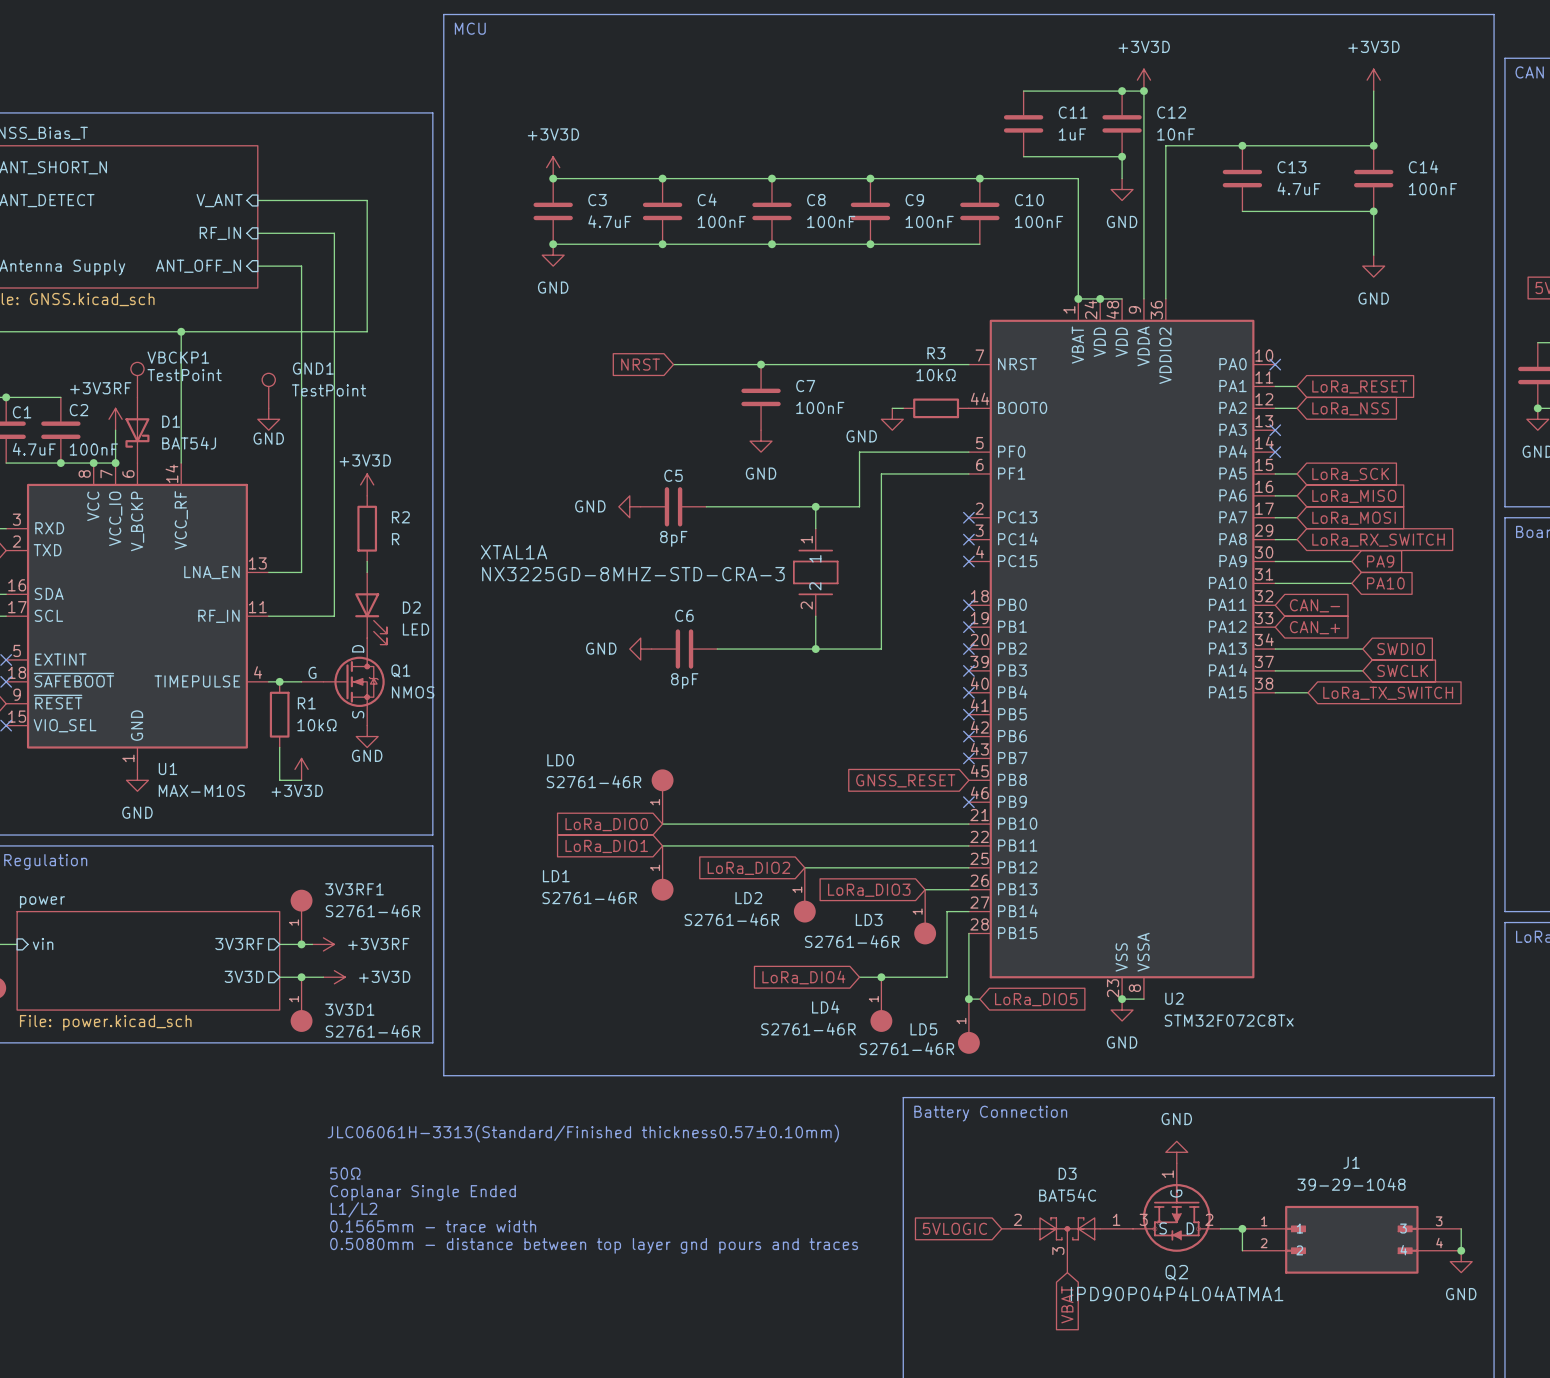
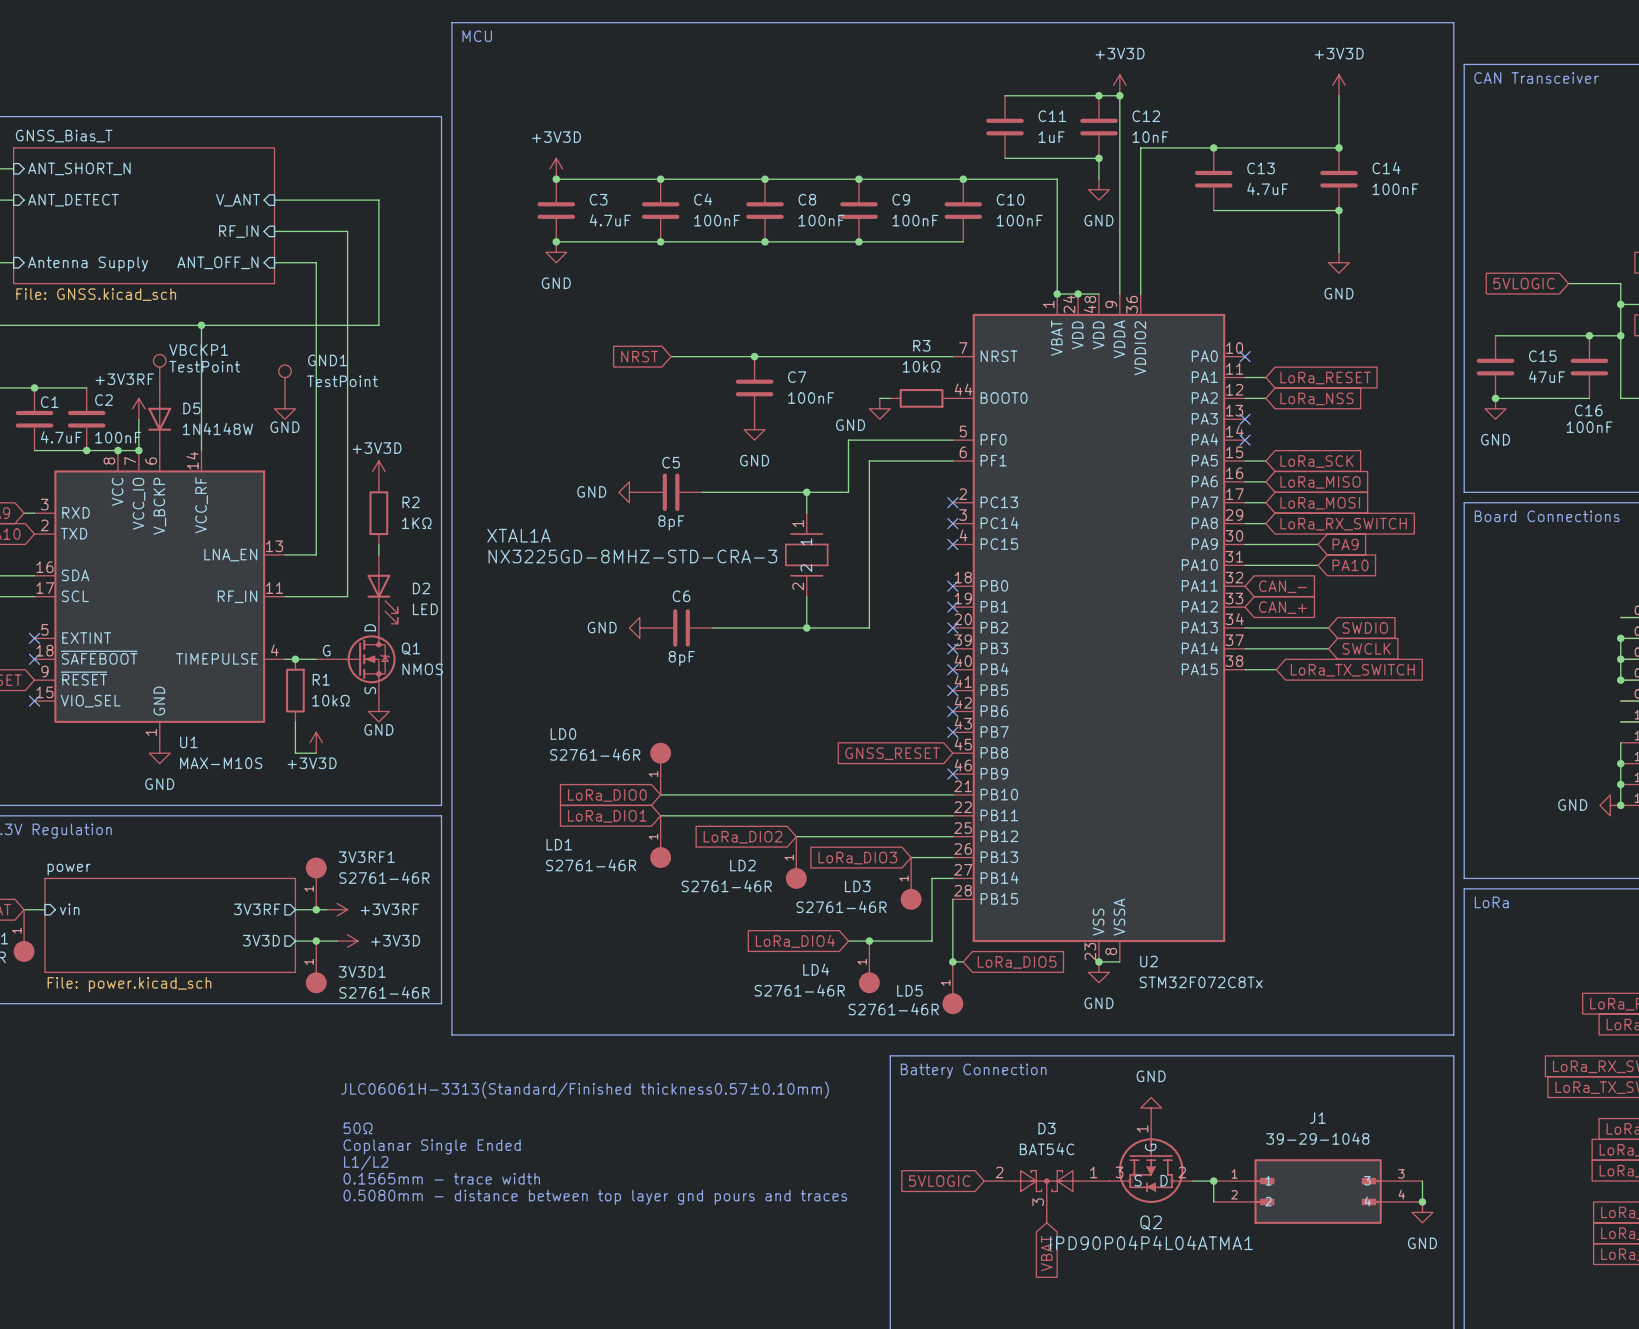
D1: BAT54J (137, 430) -> none
D5: none -> 1N4148W (159, 419)
R2 value: R (395, 539) -> 1KΩ (416, 523)

